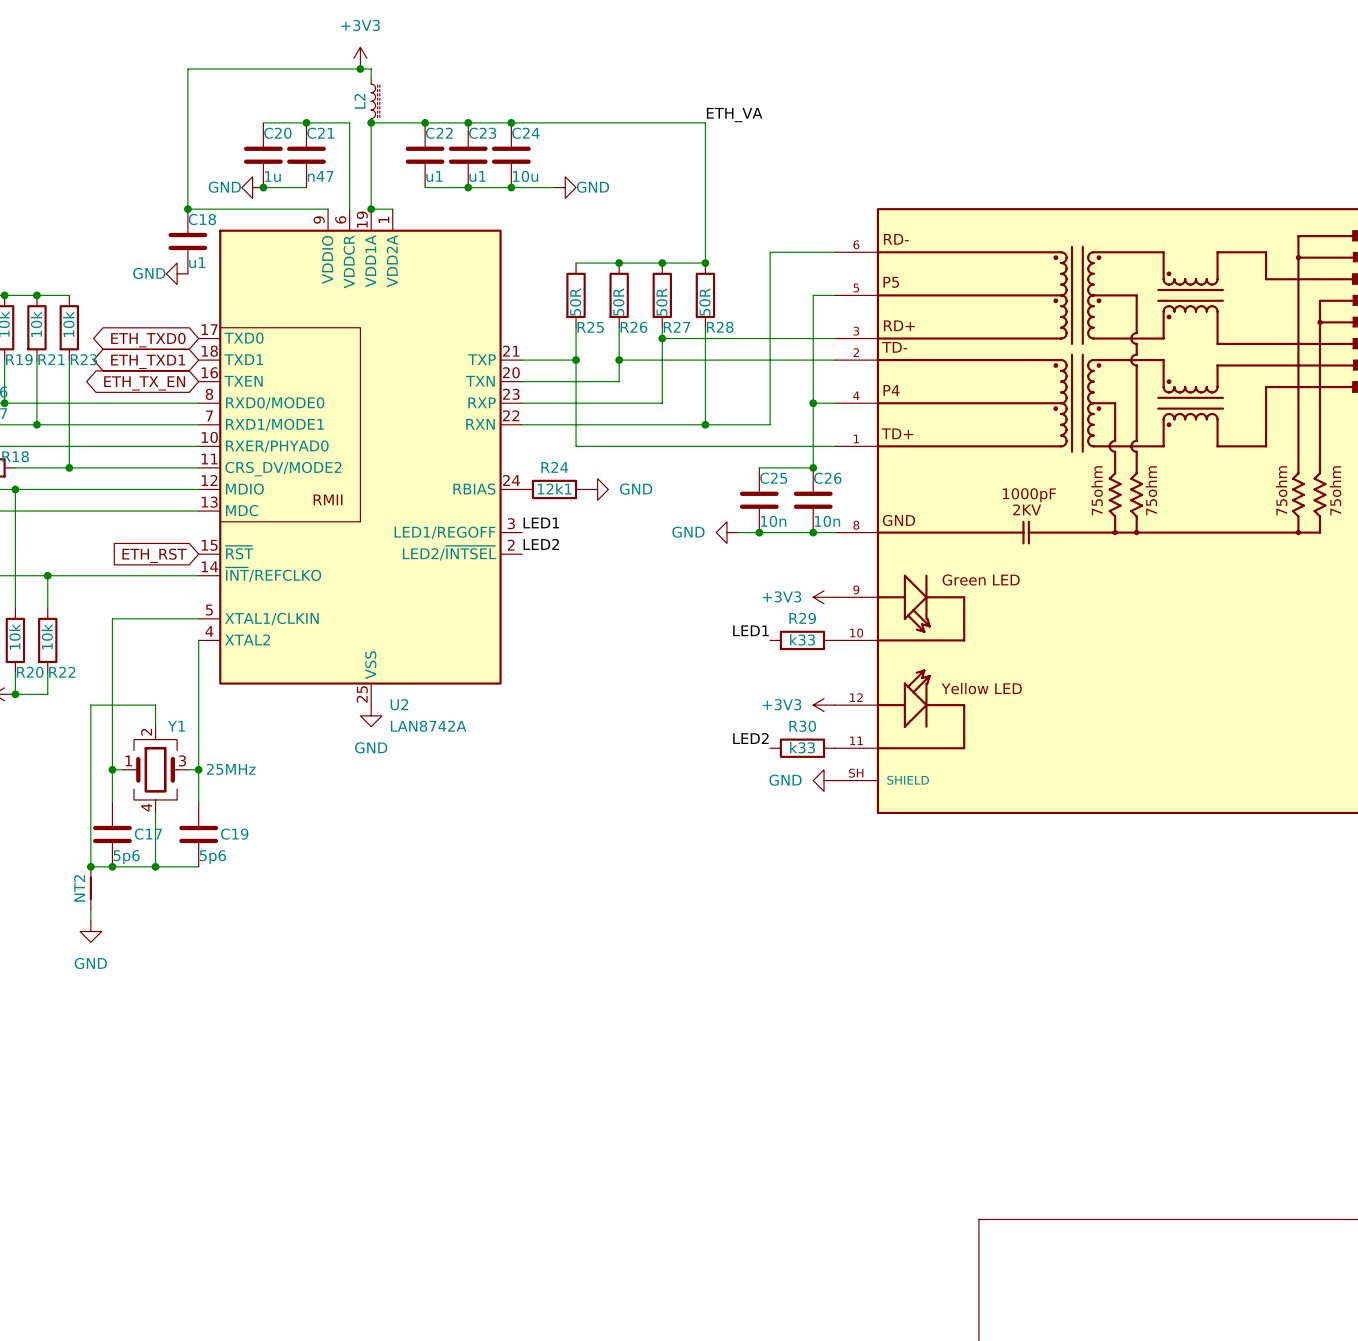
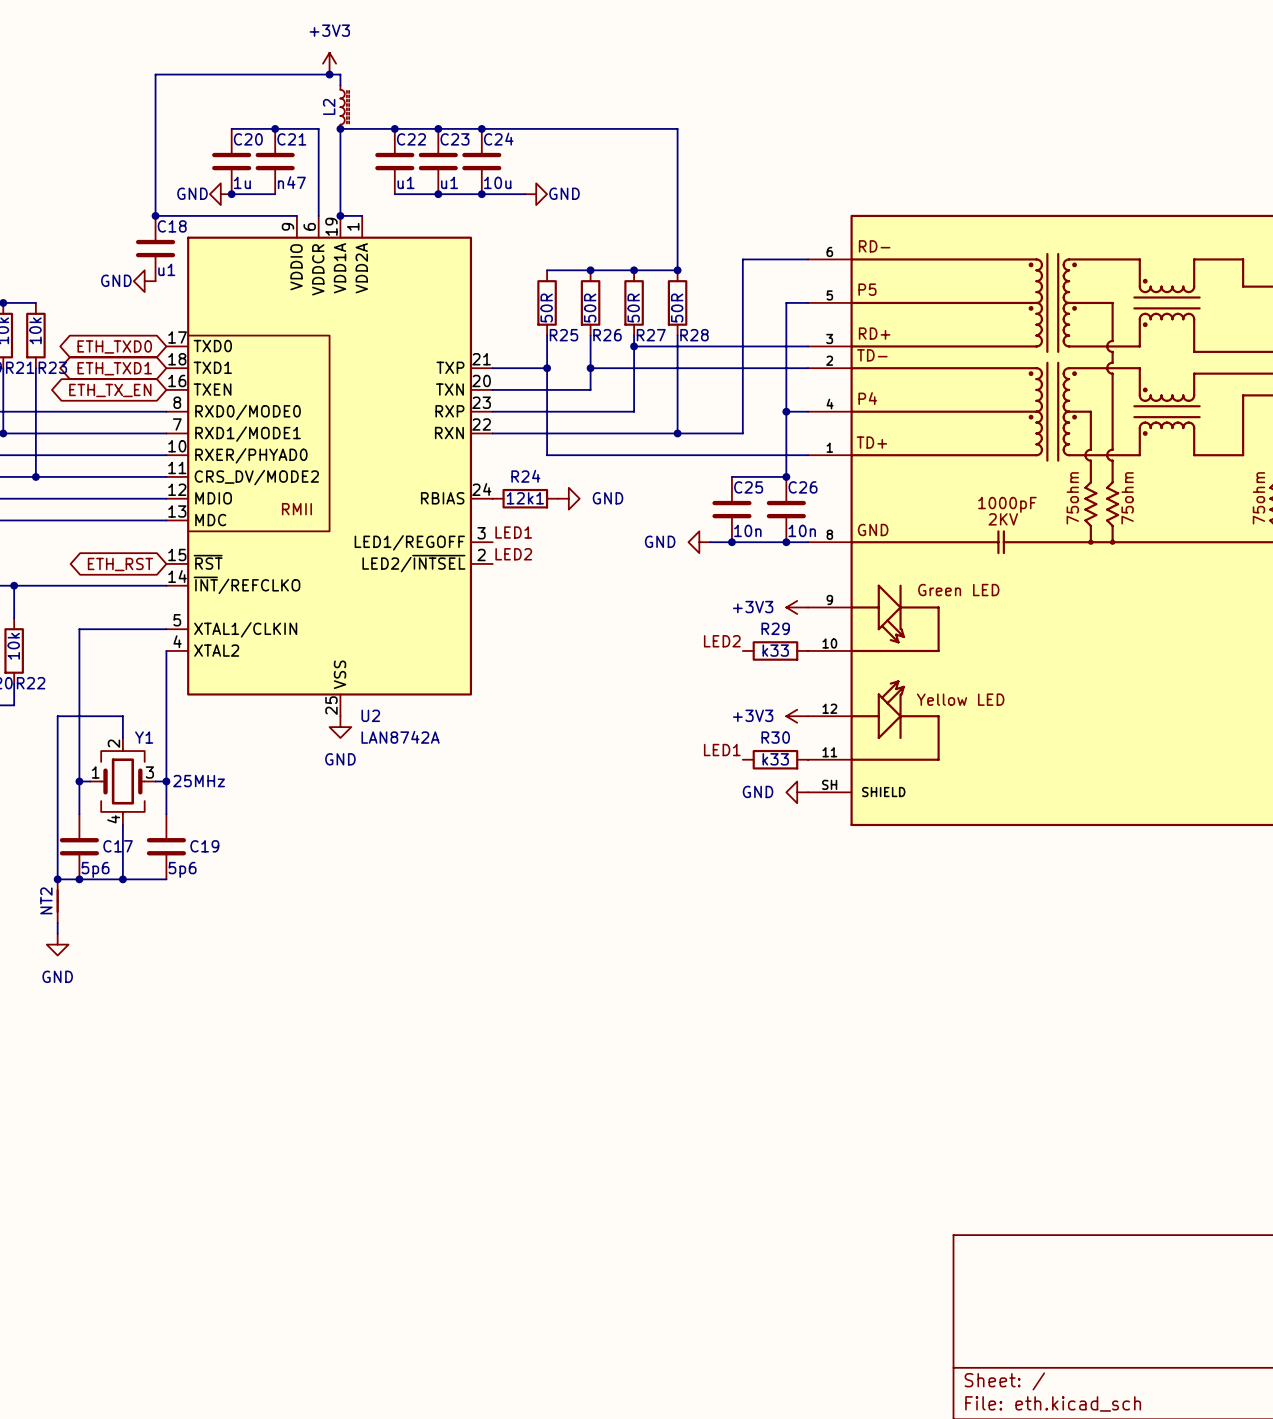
label: ETH_VA (734, 115) -> none
global label shape: input (154, 555) -> bidirectional (120, 564)
label: LED1 (750, 630) -> LED2 (722, 641)
label: LED2 (750, 738) -> LED1 (722, 750)

